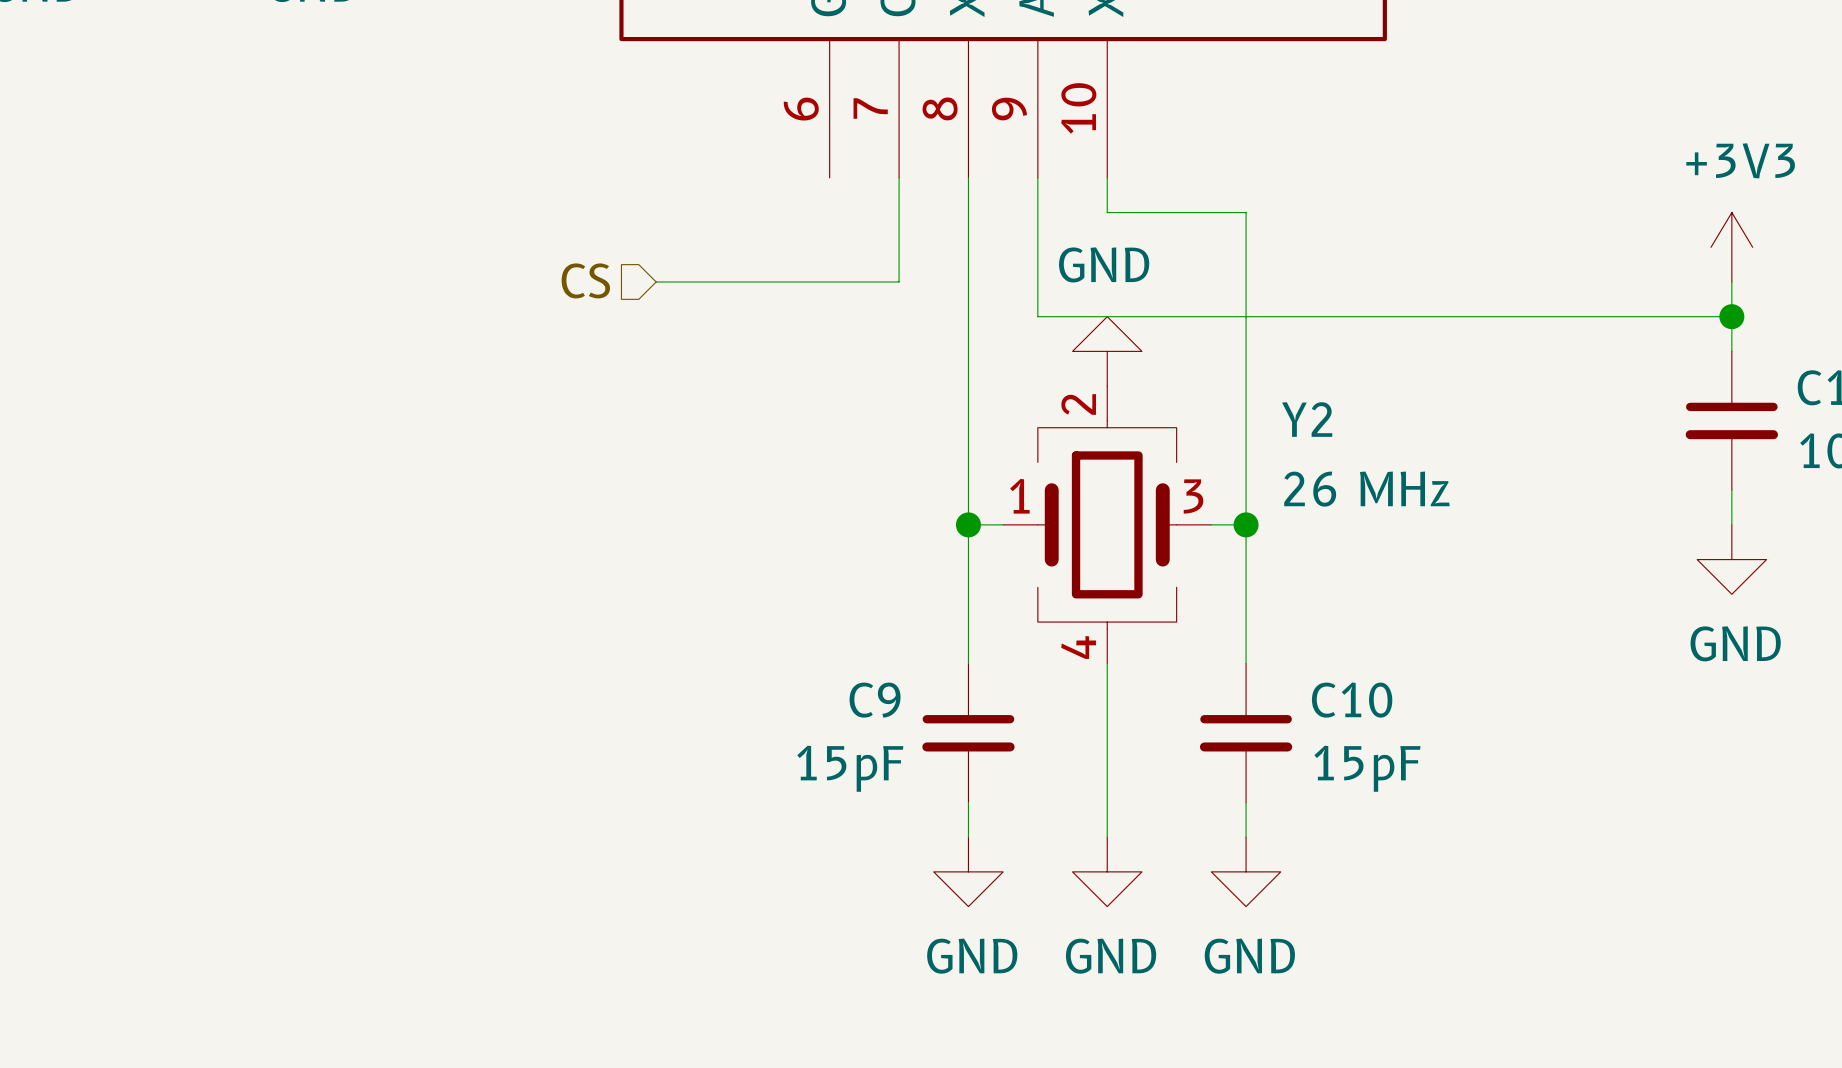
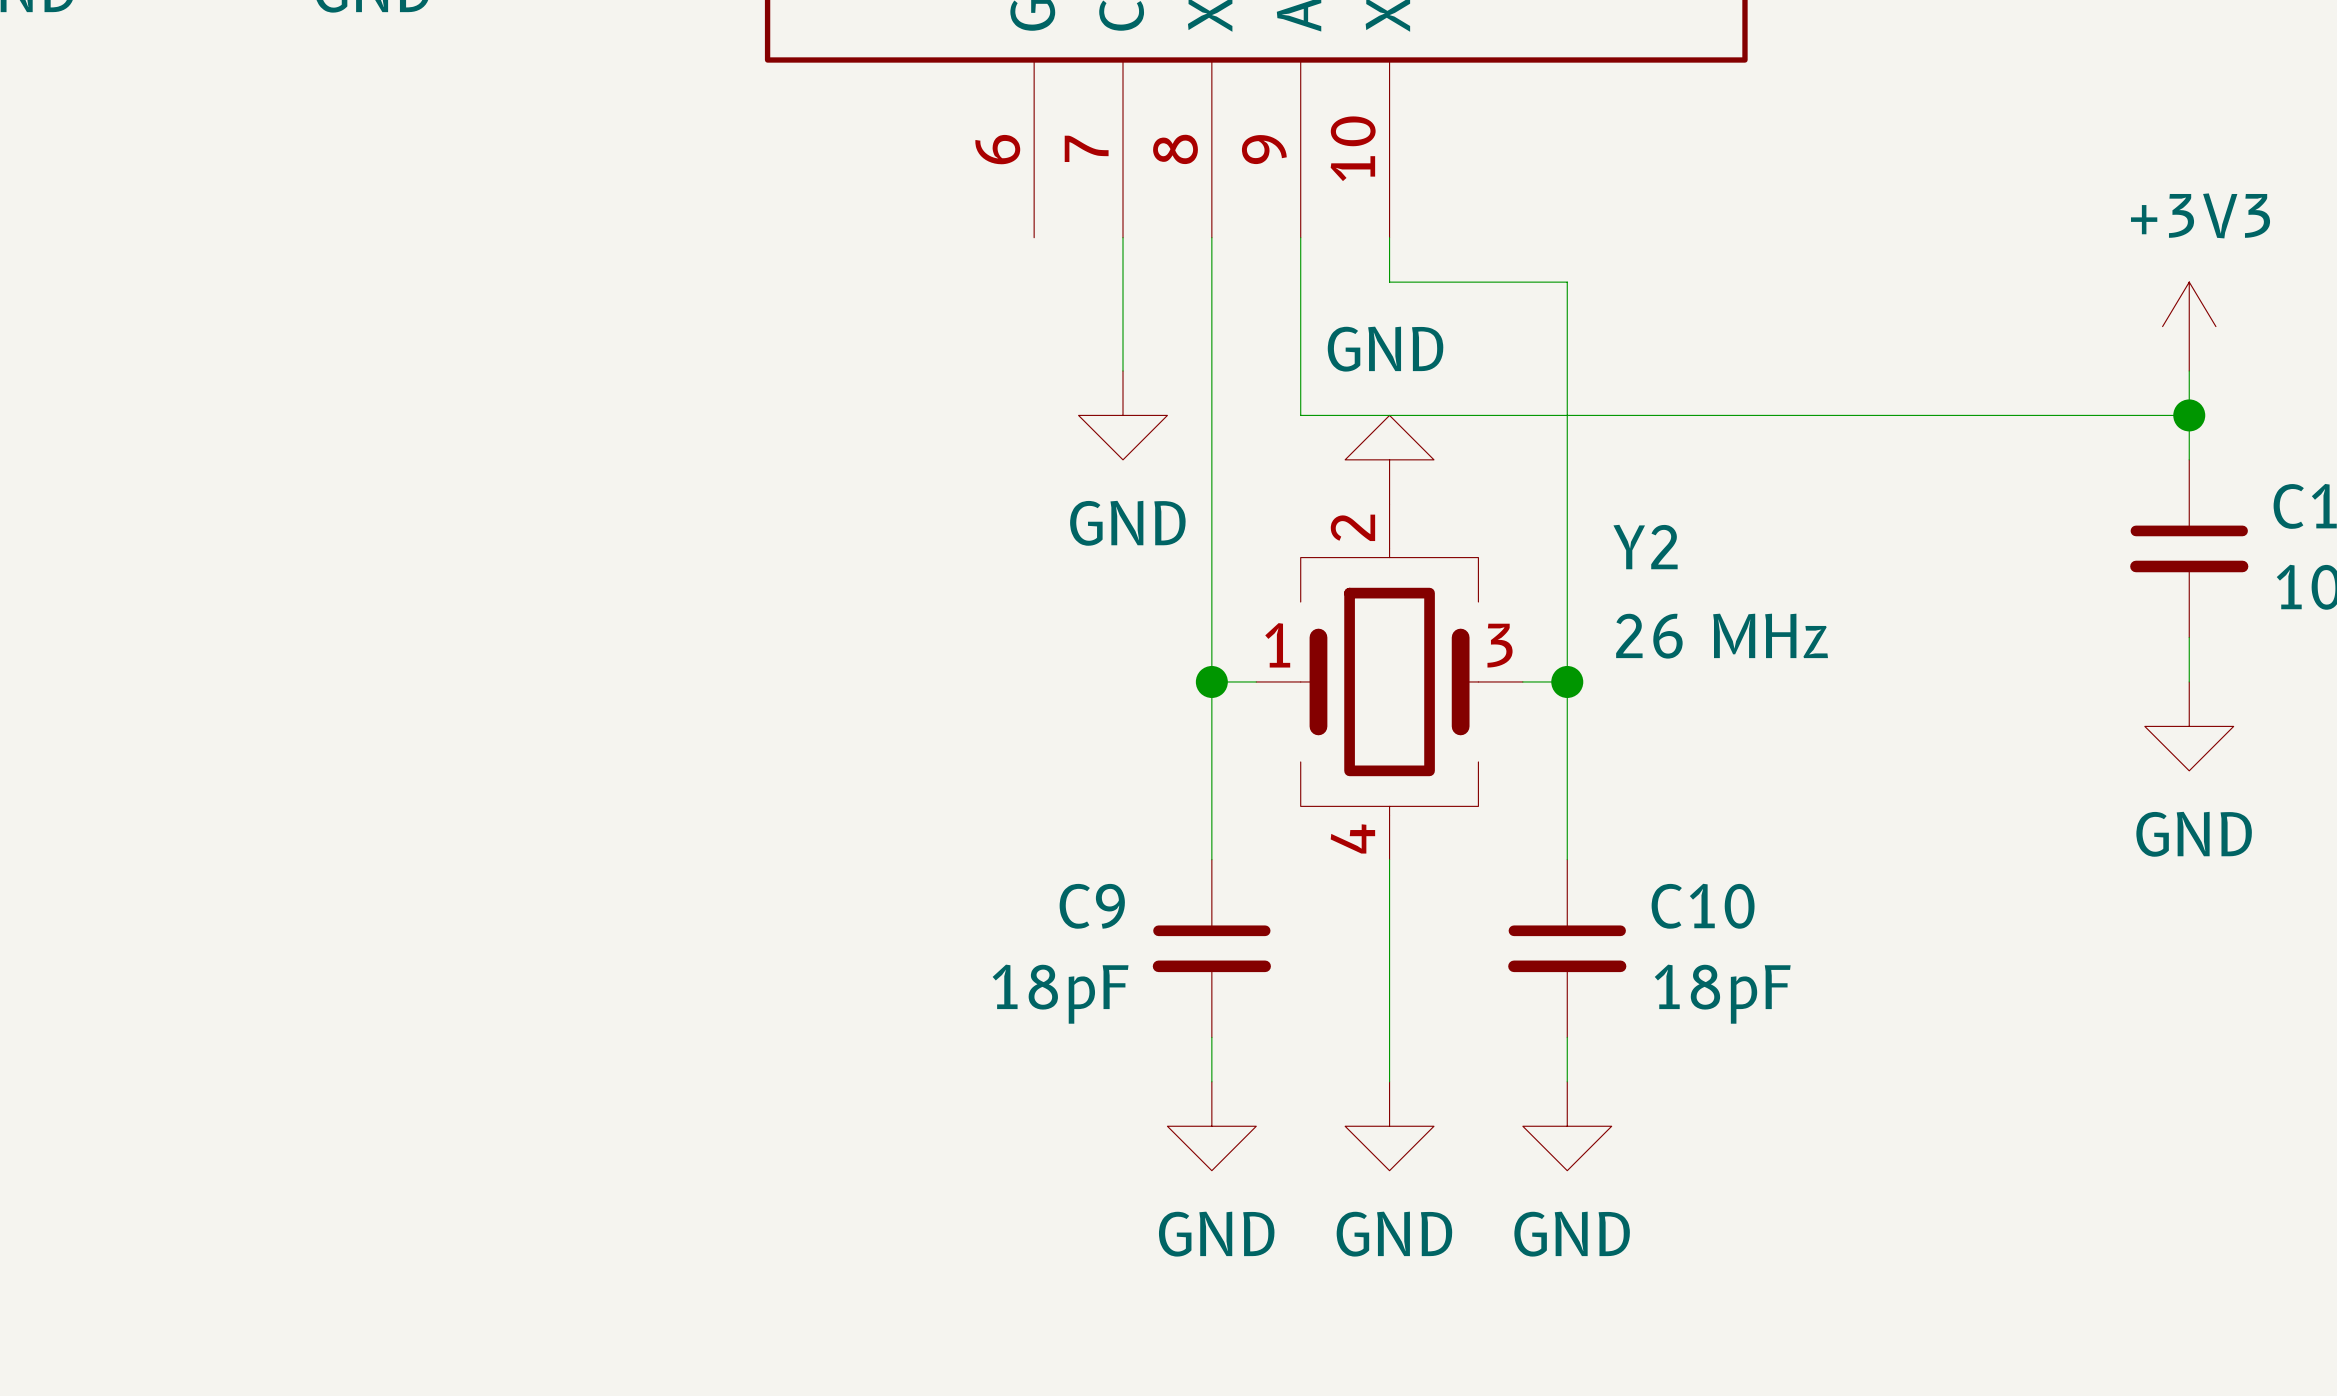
hierarchical label: CS (585, 280) -> none
wire: (656, 281) (899, 281) -> none
power symbol: none -> GND (1123, 415)
C9 value: 15pF (850, 768) -> 18pF (1060, 994)
C10 value: 15pF (1367, 768) -> 18pF (1722, 994)

